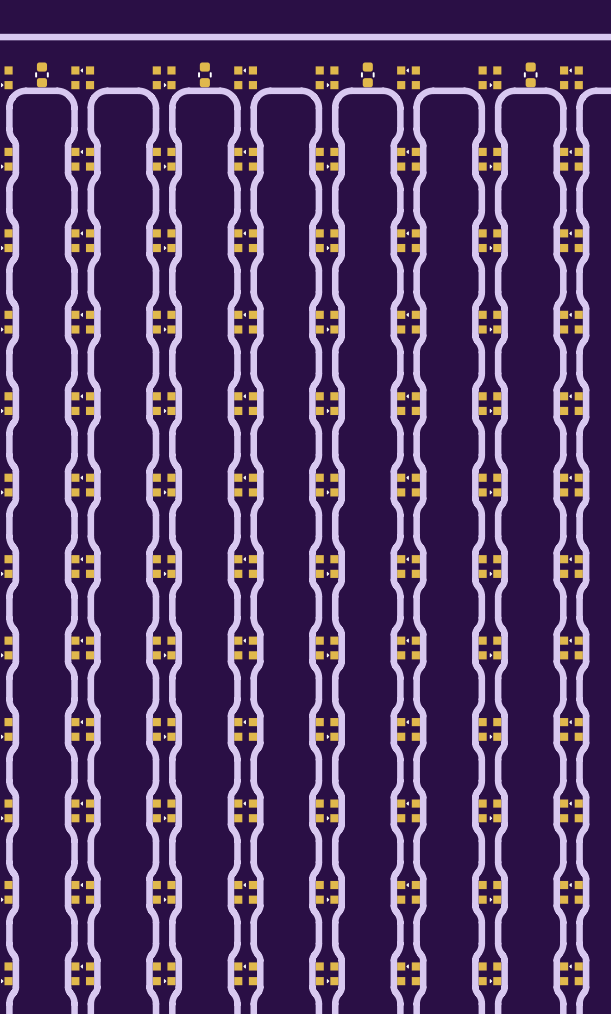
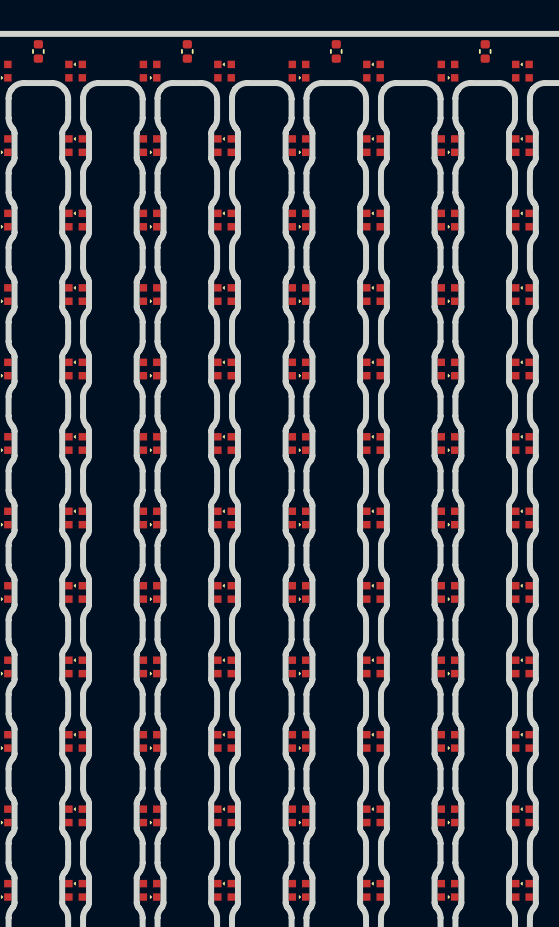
part position: (41, 74) -> (38, 51)
part position: (204, 74) -> (187, 51)
part position: (367, 74) -> (336, 51)
part position: (530, 74) -> (485, 51)

